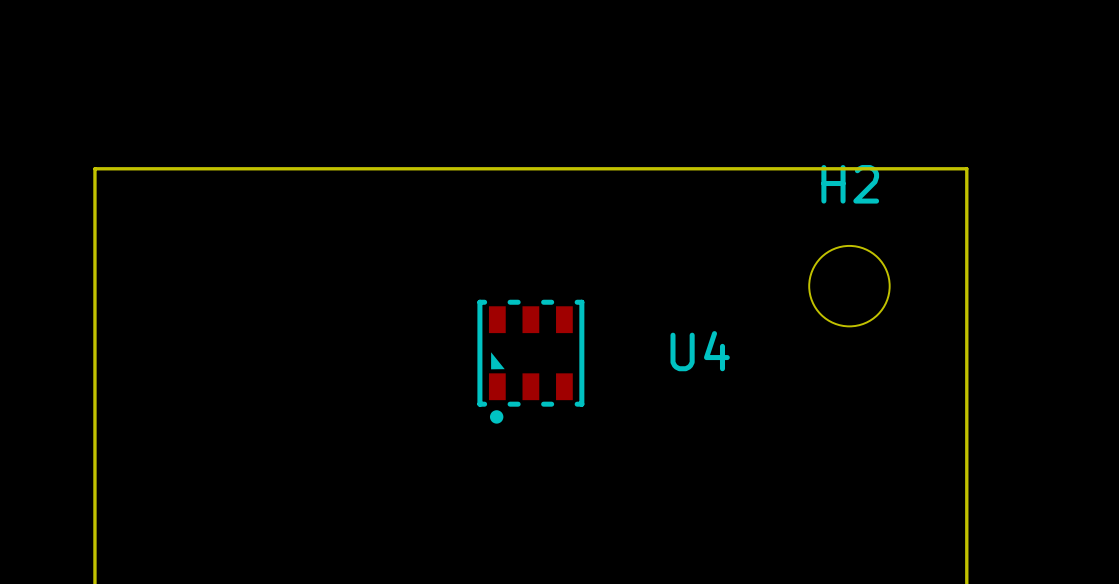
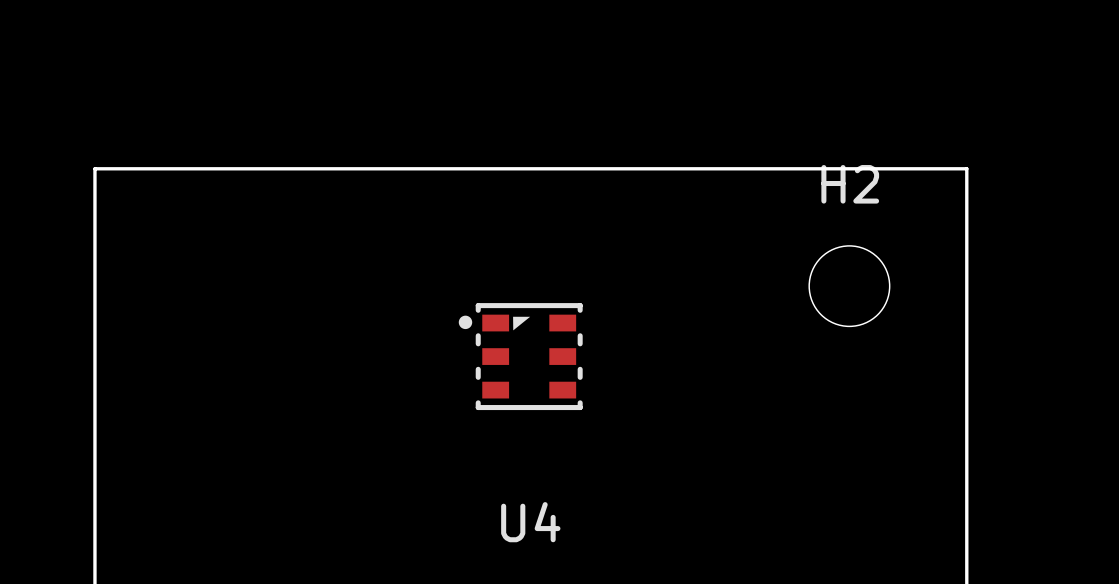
U4 rotation: 0° (530, 361) -> 90° clockwise (520, 356)

